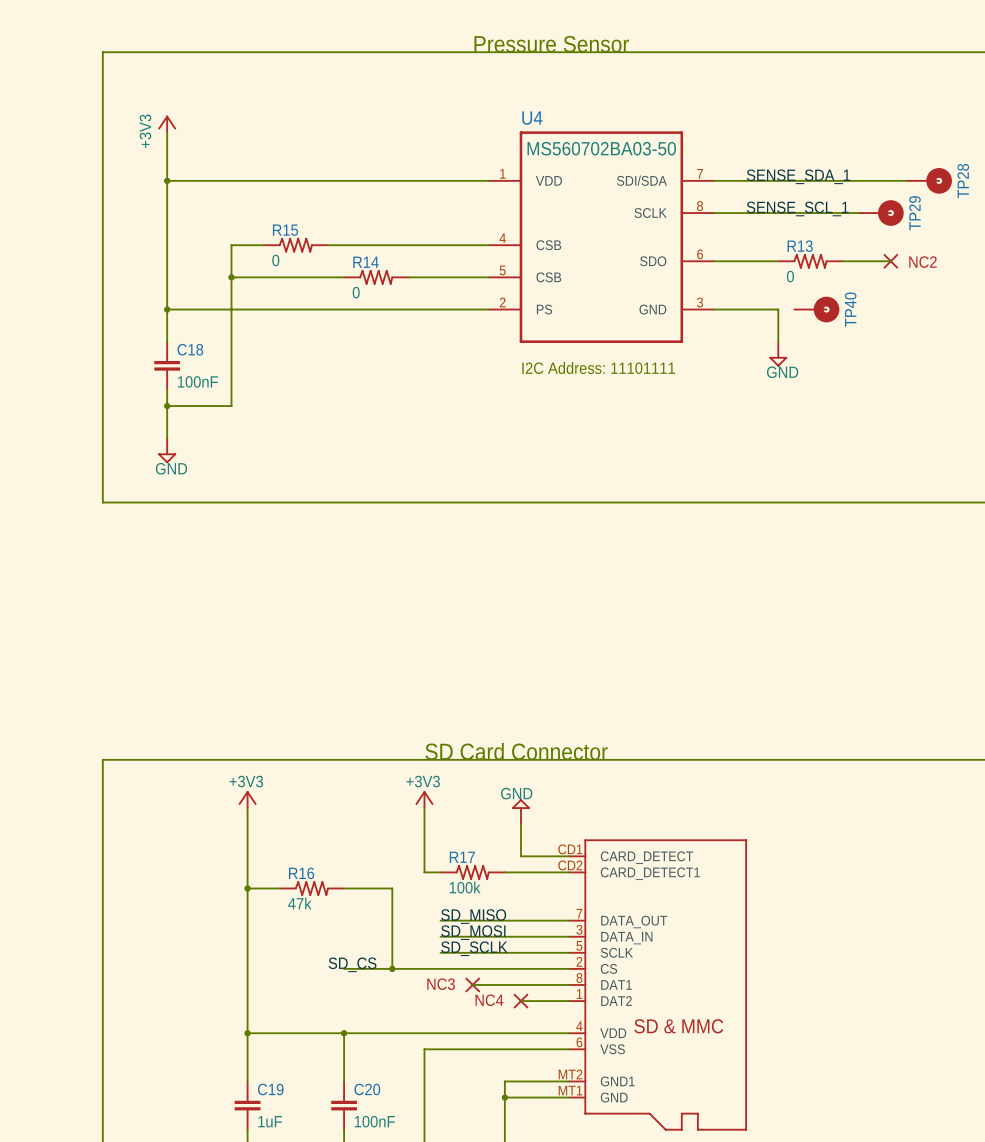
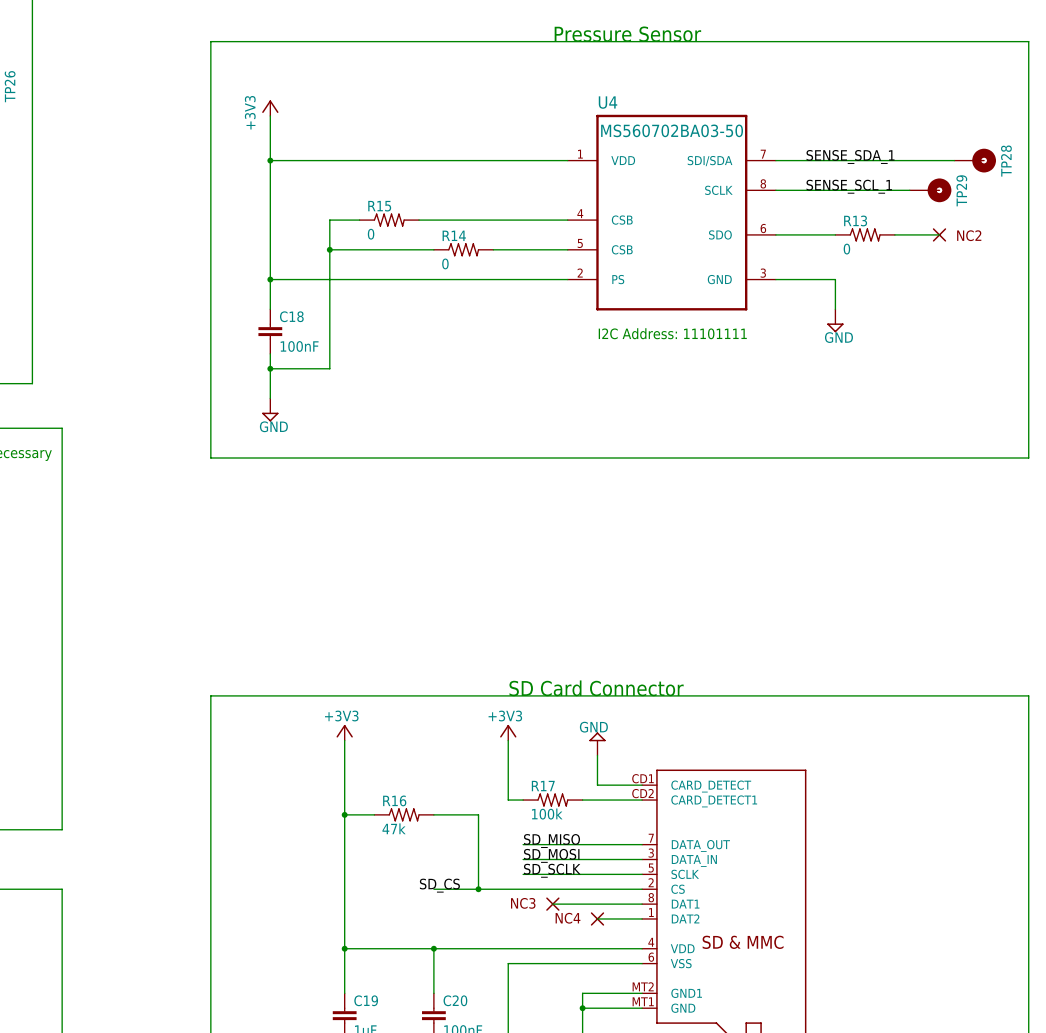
TP40: (816, 309) -> none

